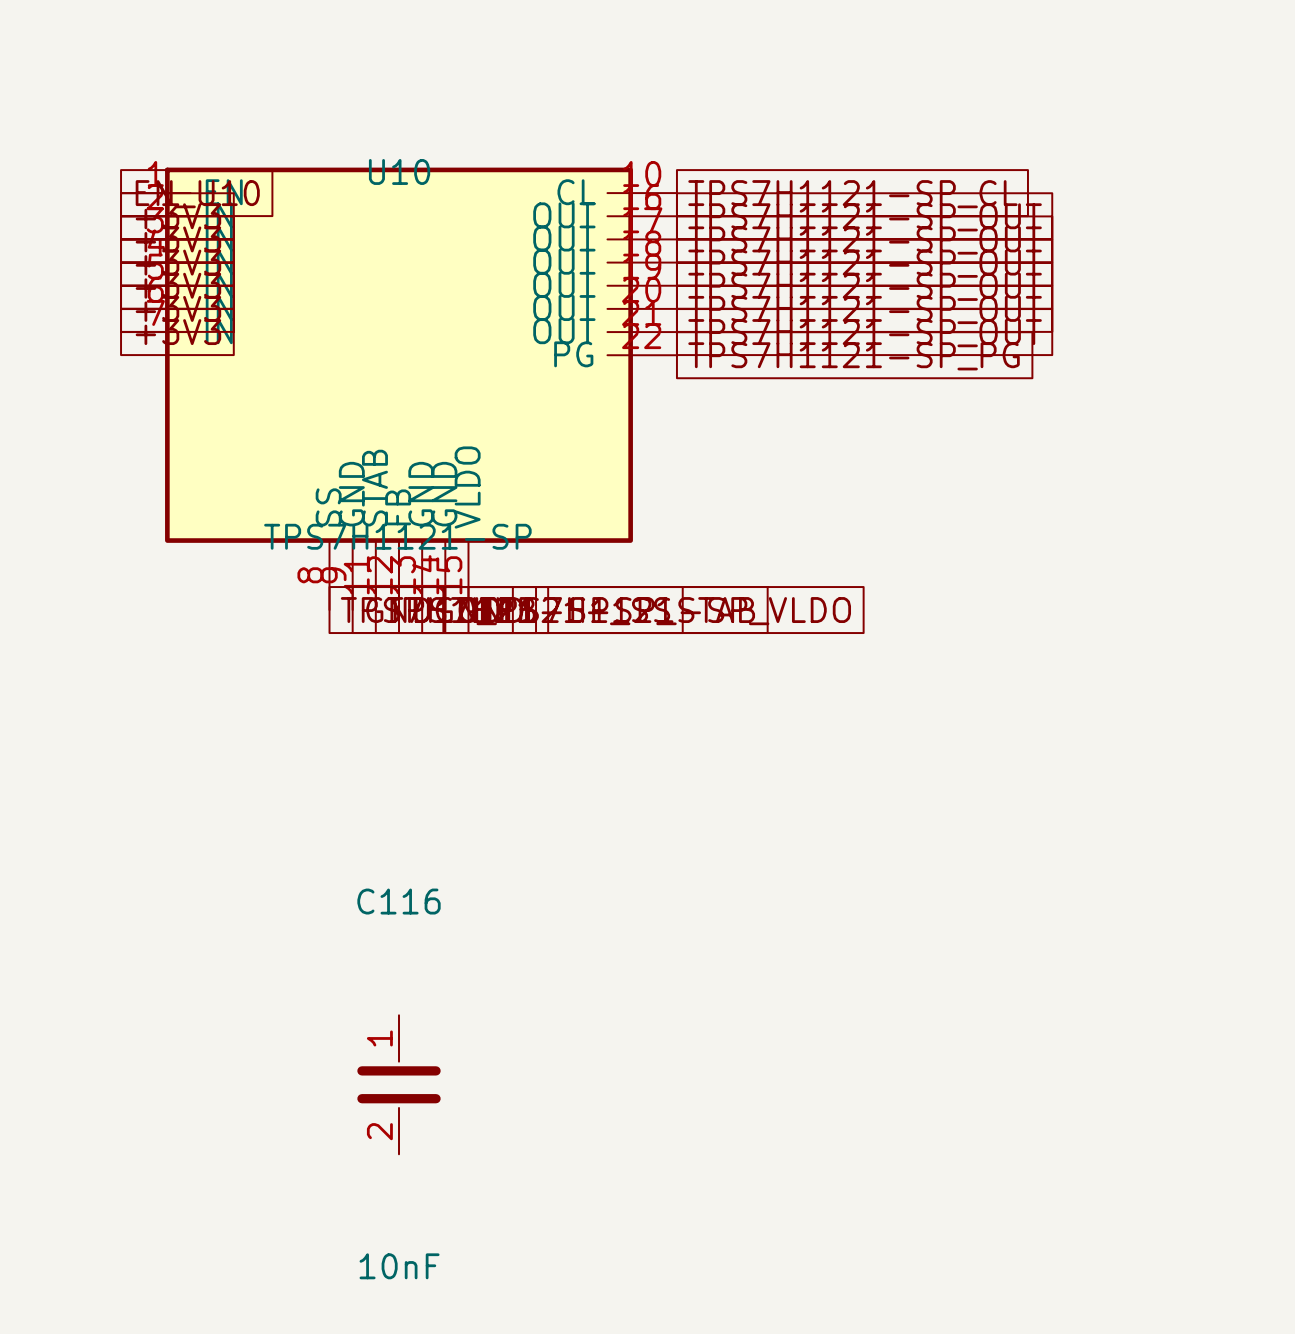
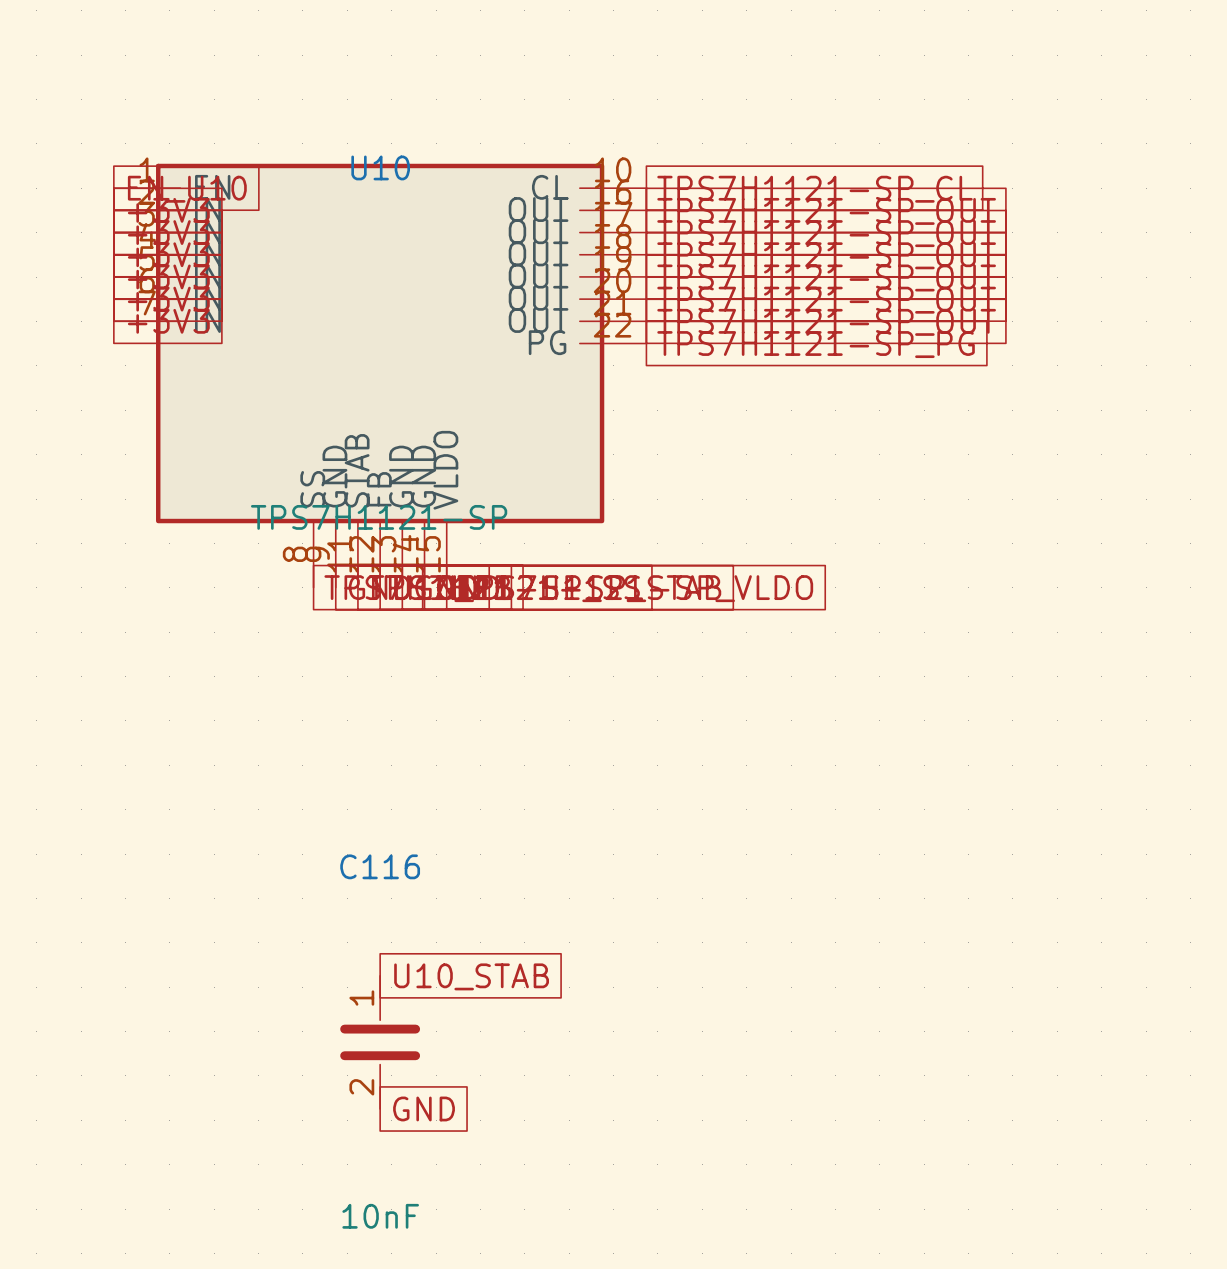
global label: none -> U10_STAB (471, 976)
global label: none -> GND (424, 1108)

